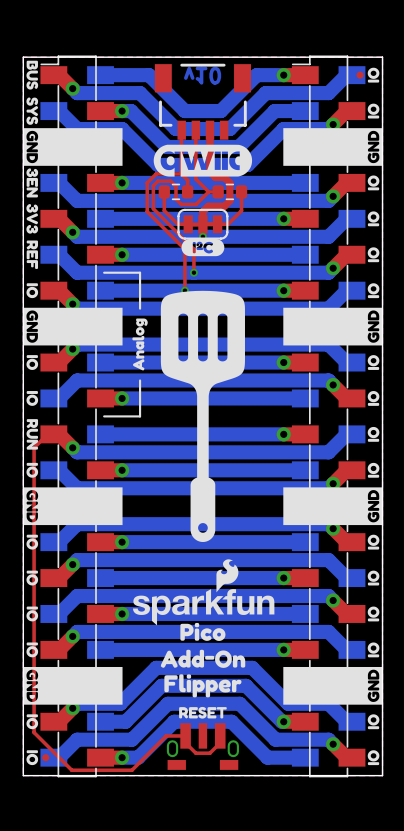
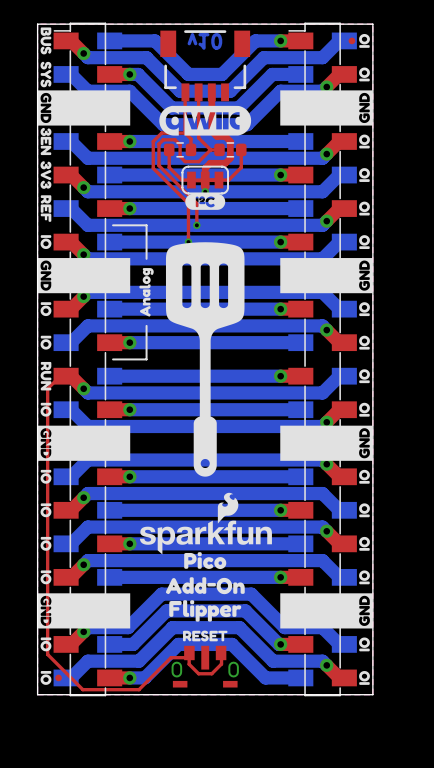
part footprint: [166, 723, 239, 770] -> [171, 645, 239, 688]

